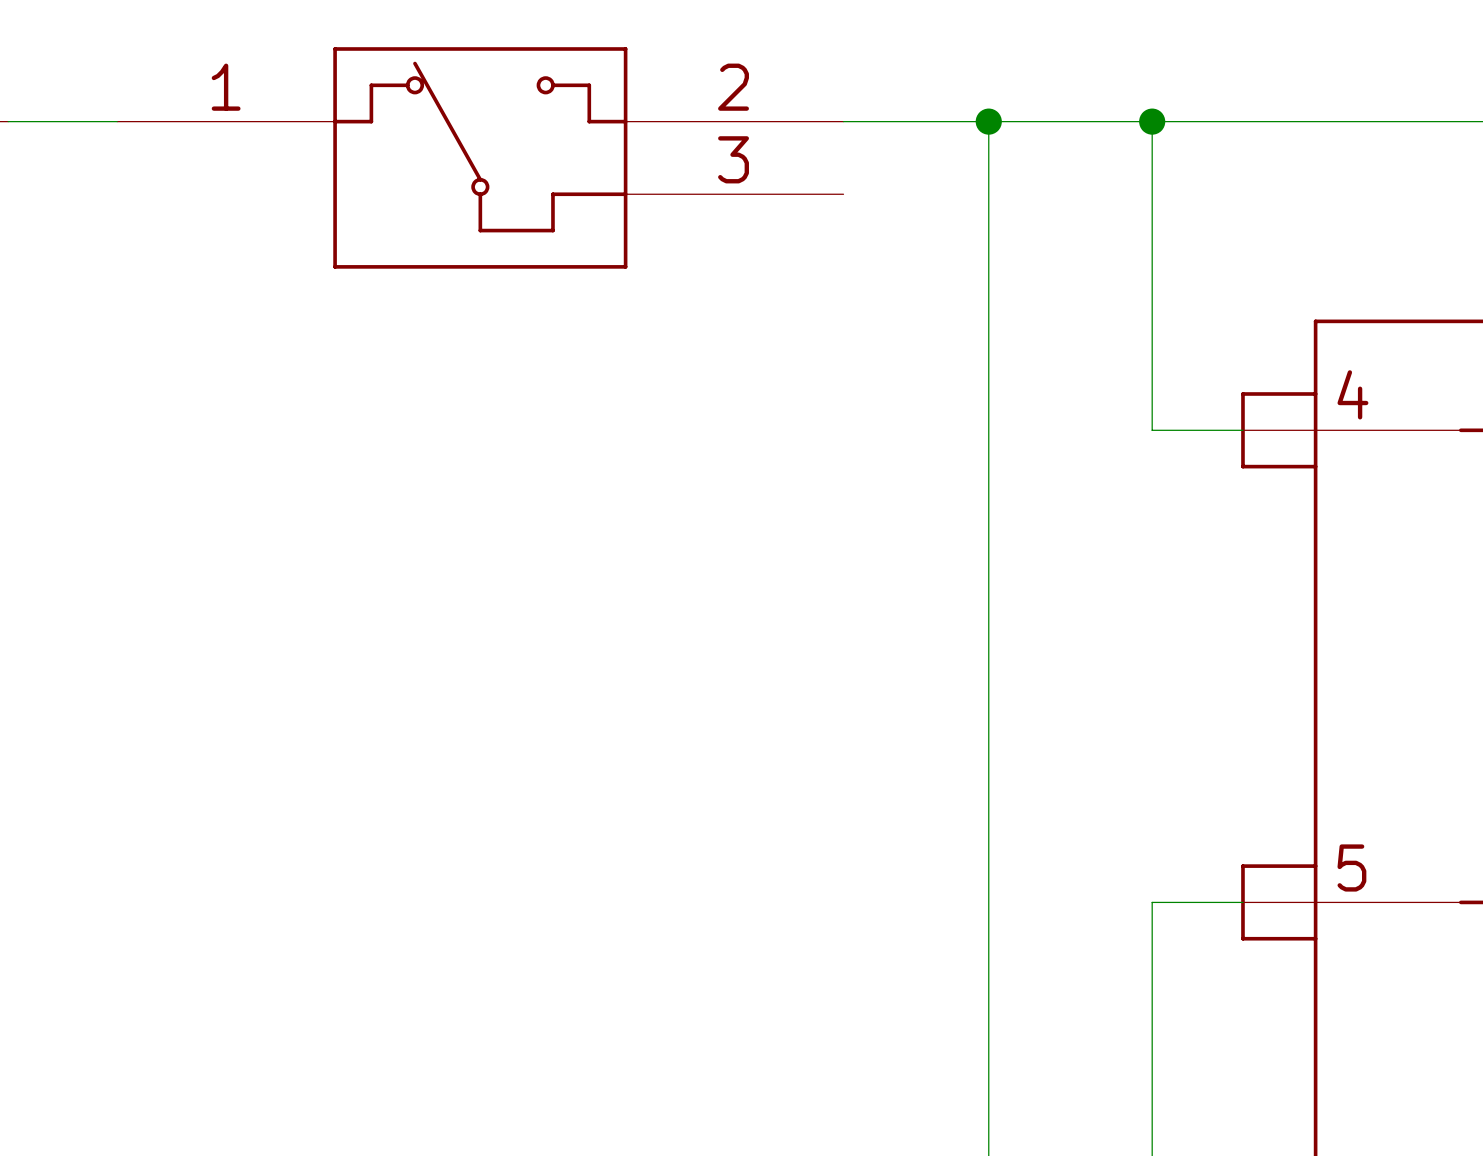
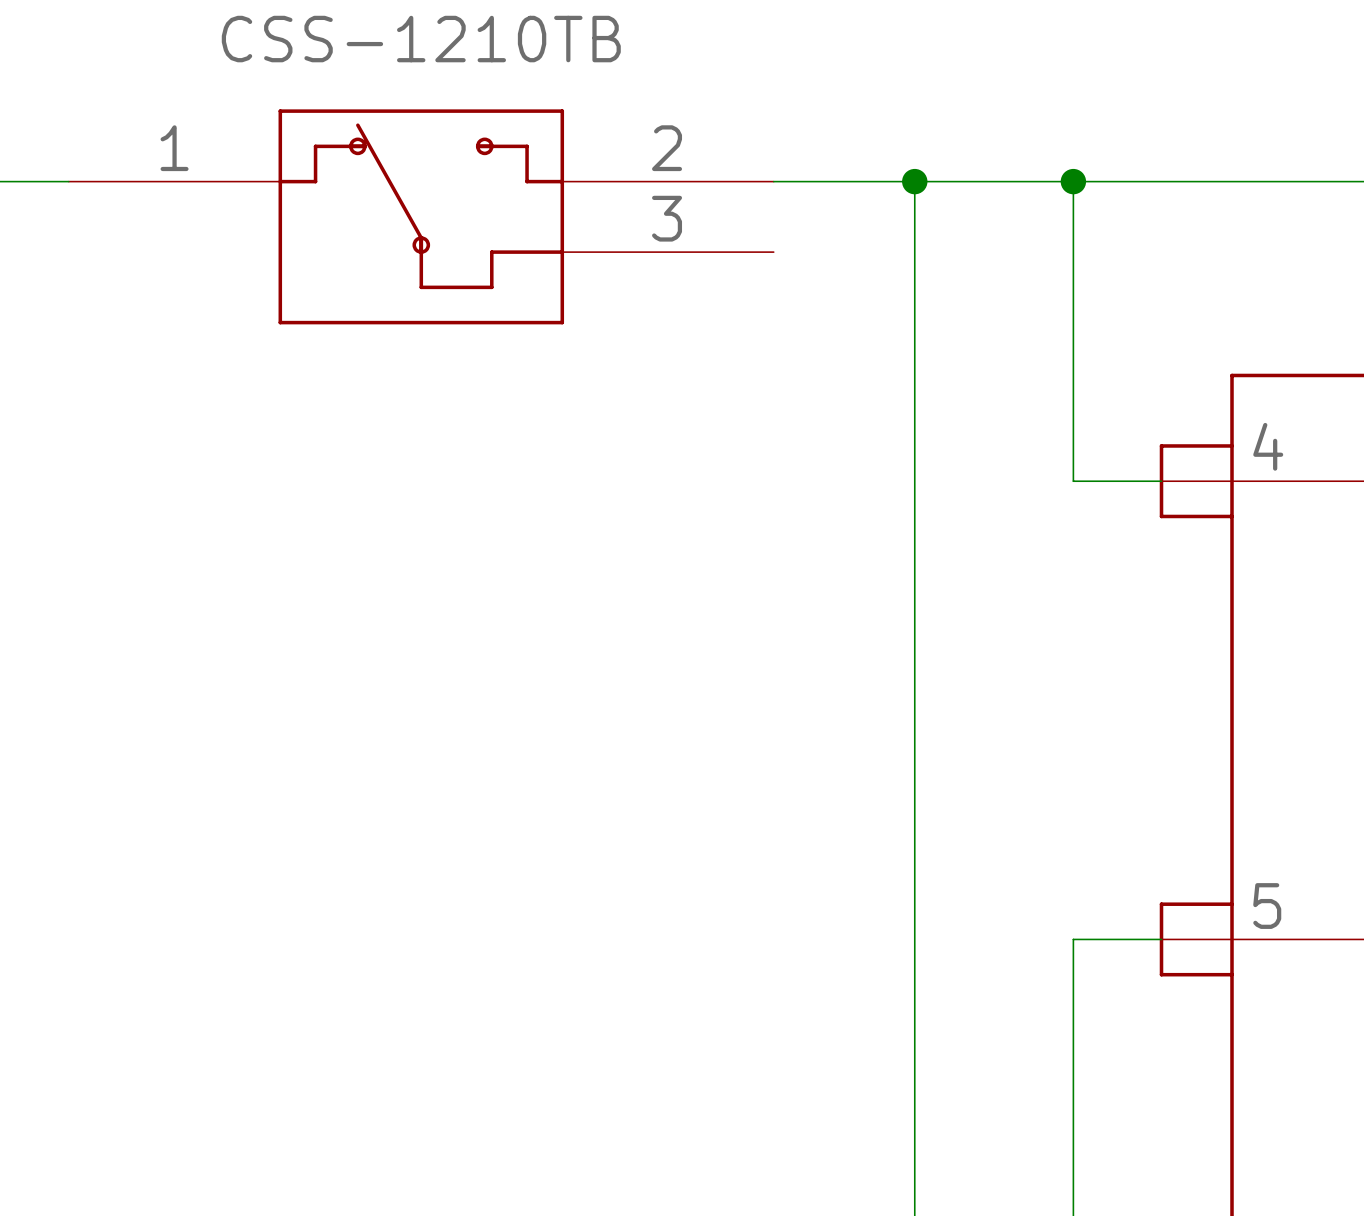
part symbol: [117, 47, 844, 269] -> [68, 109, 774, 325]

